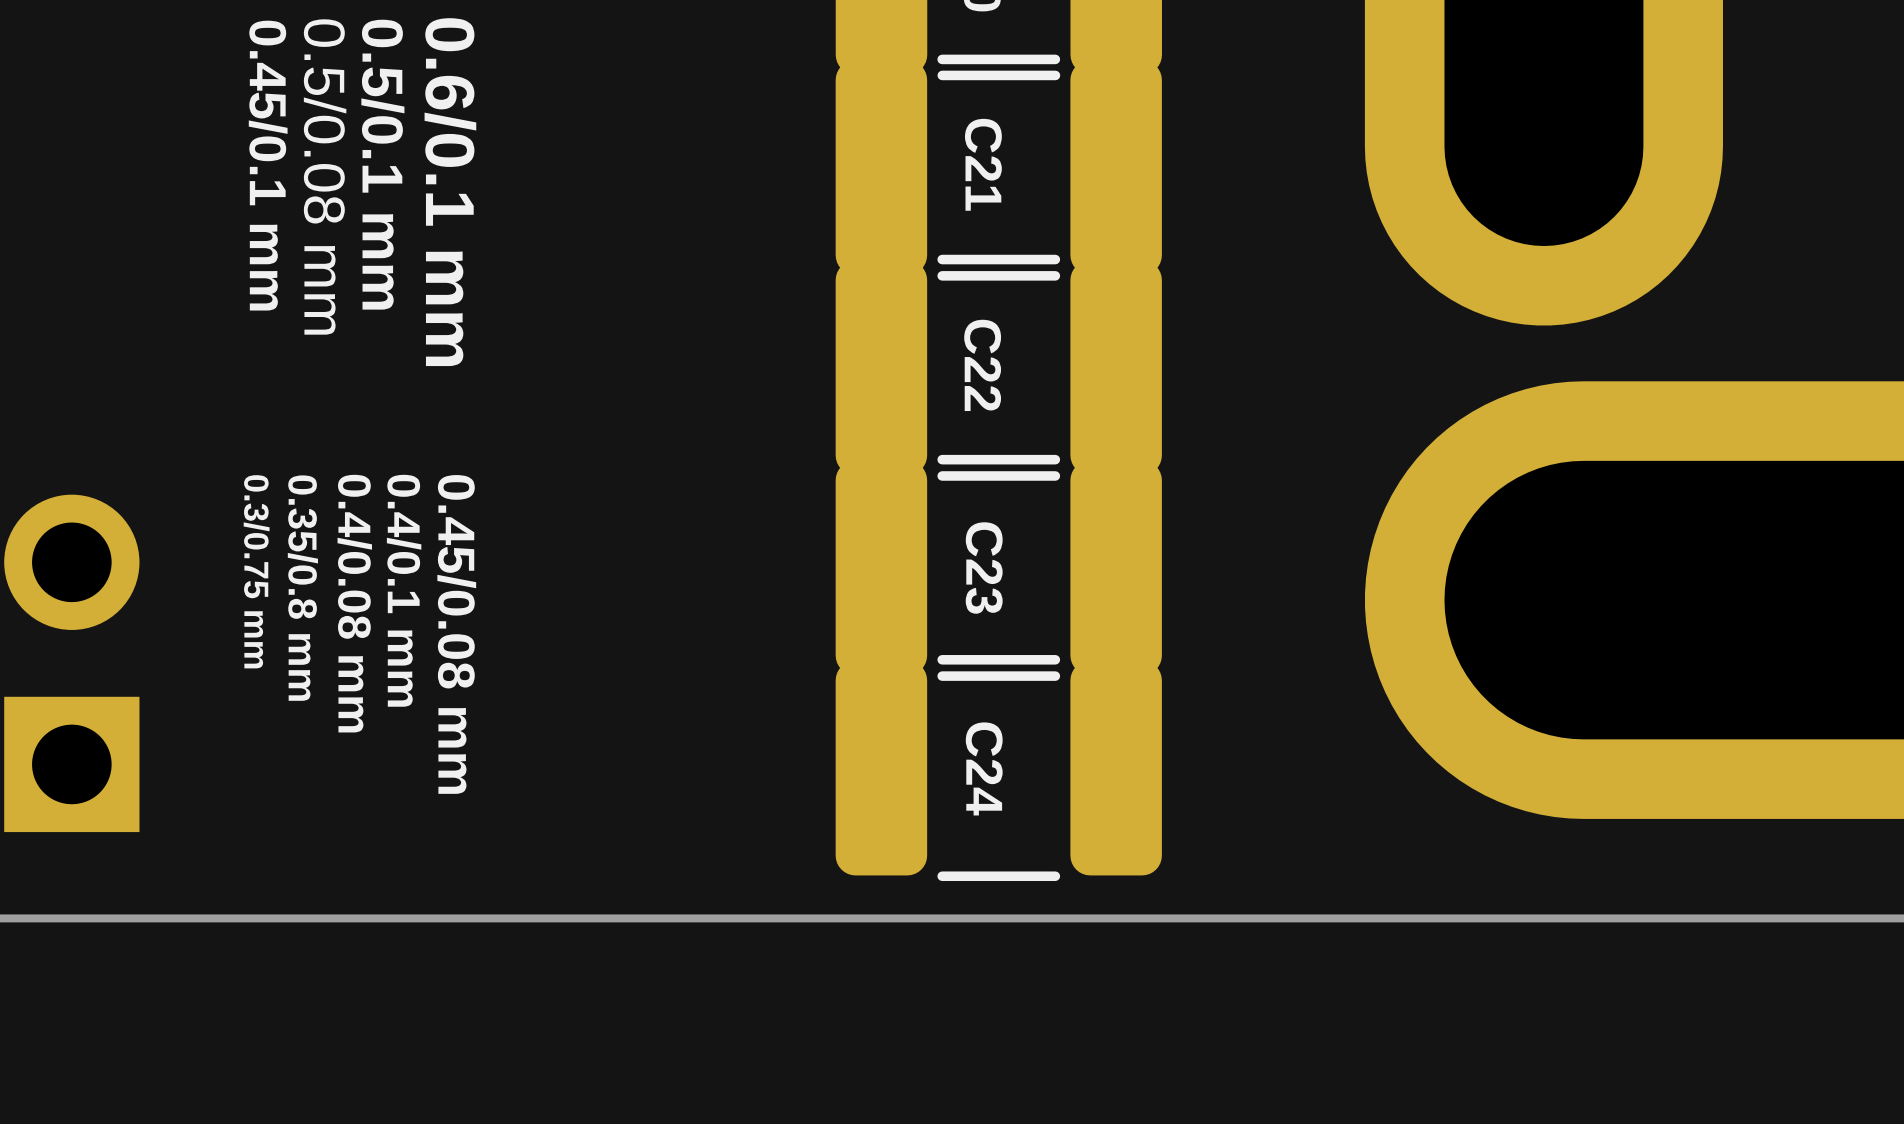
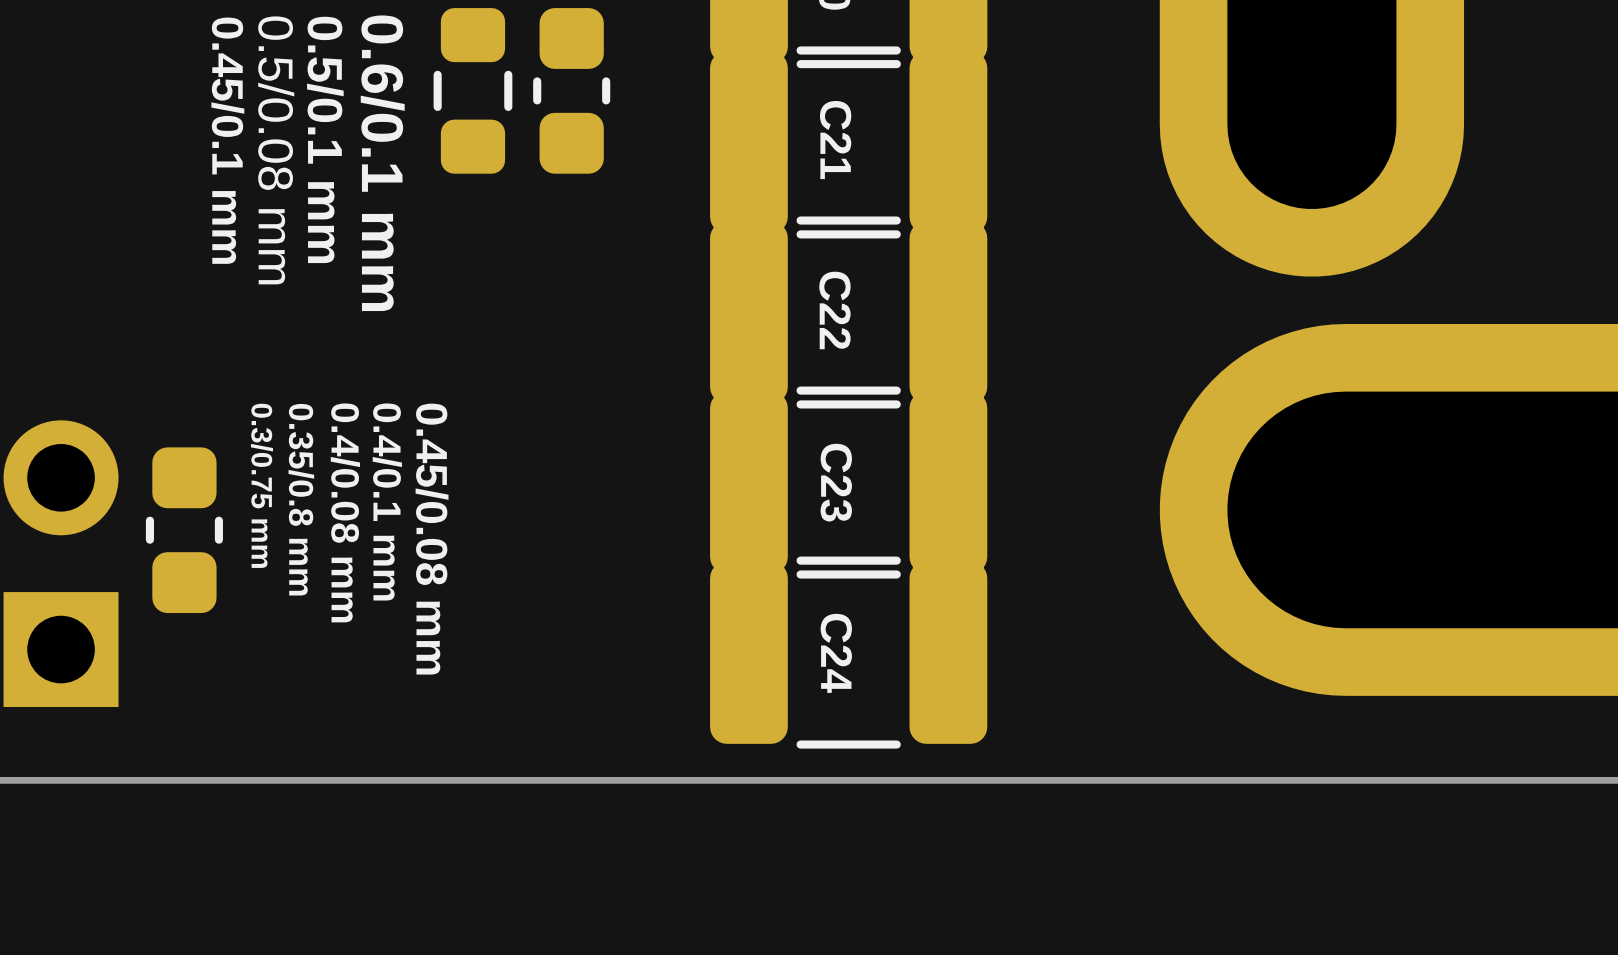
part: none -> (472, 90)
part: none -> (571, 90)
text position: 0.3/0.75 mm (256, 571) -> 0.3/0.75 mm (262, 485)
text position: 0.35/0.8 mm (302, 588) -> 0.35/0.8 mm (301, 499)
text position: 0.4/0.1 mm (404, 590) -> 0.4/0.1 mm (387, 501)
text position: 0.4/0.08 mm (354, 603) -> 0.4/0.08 mm (345, 512)
part: none -> (184, 530)
text position: 0.45/0.08 mm (456, 634) -> 0.45/0.08 mm (432, 539)

